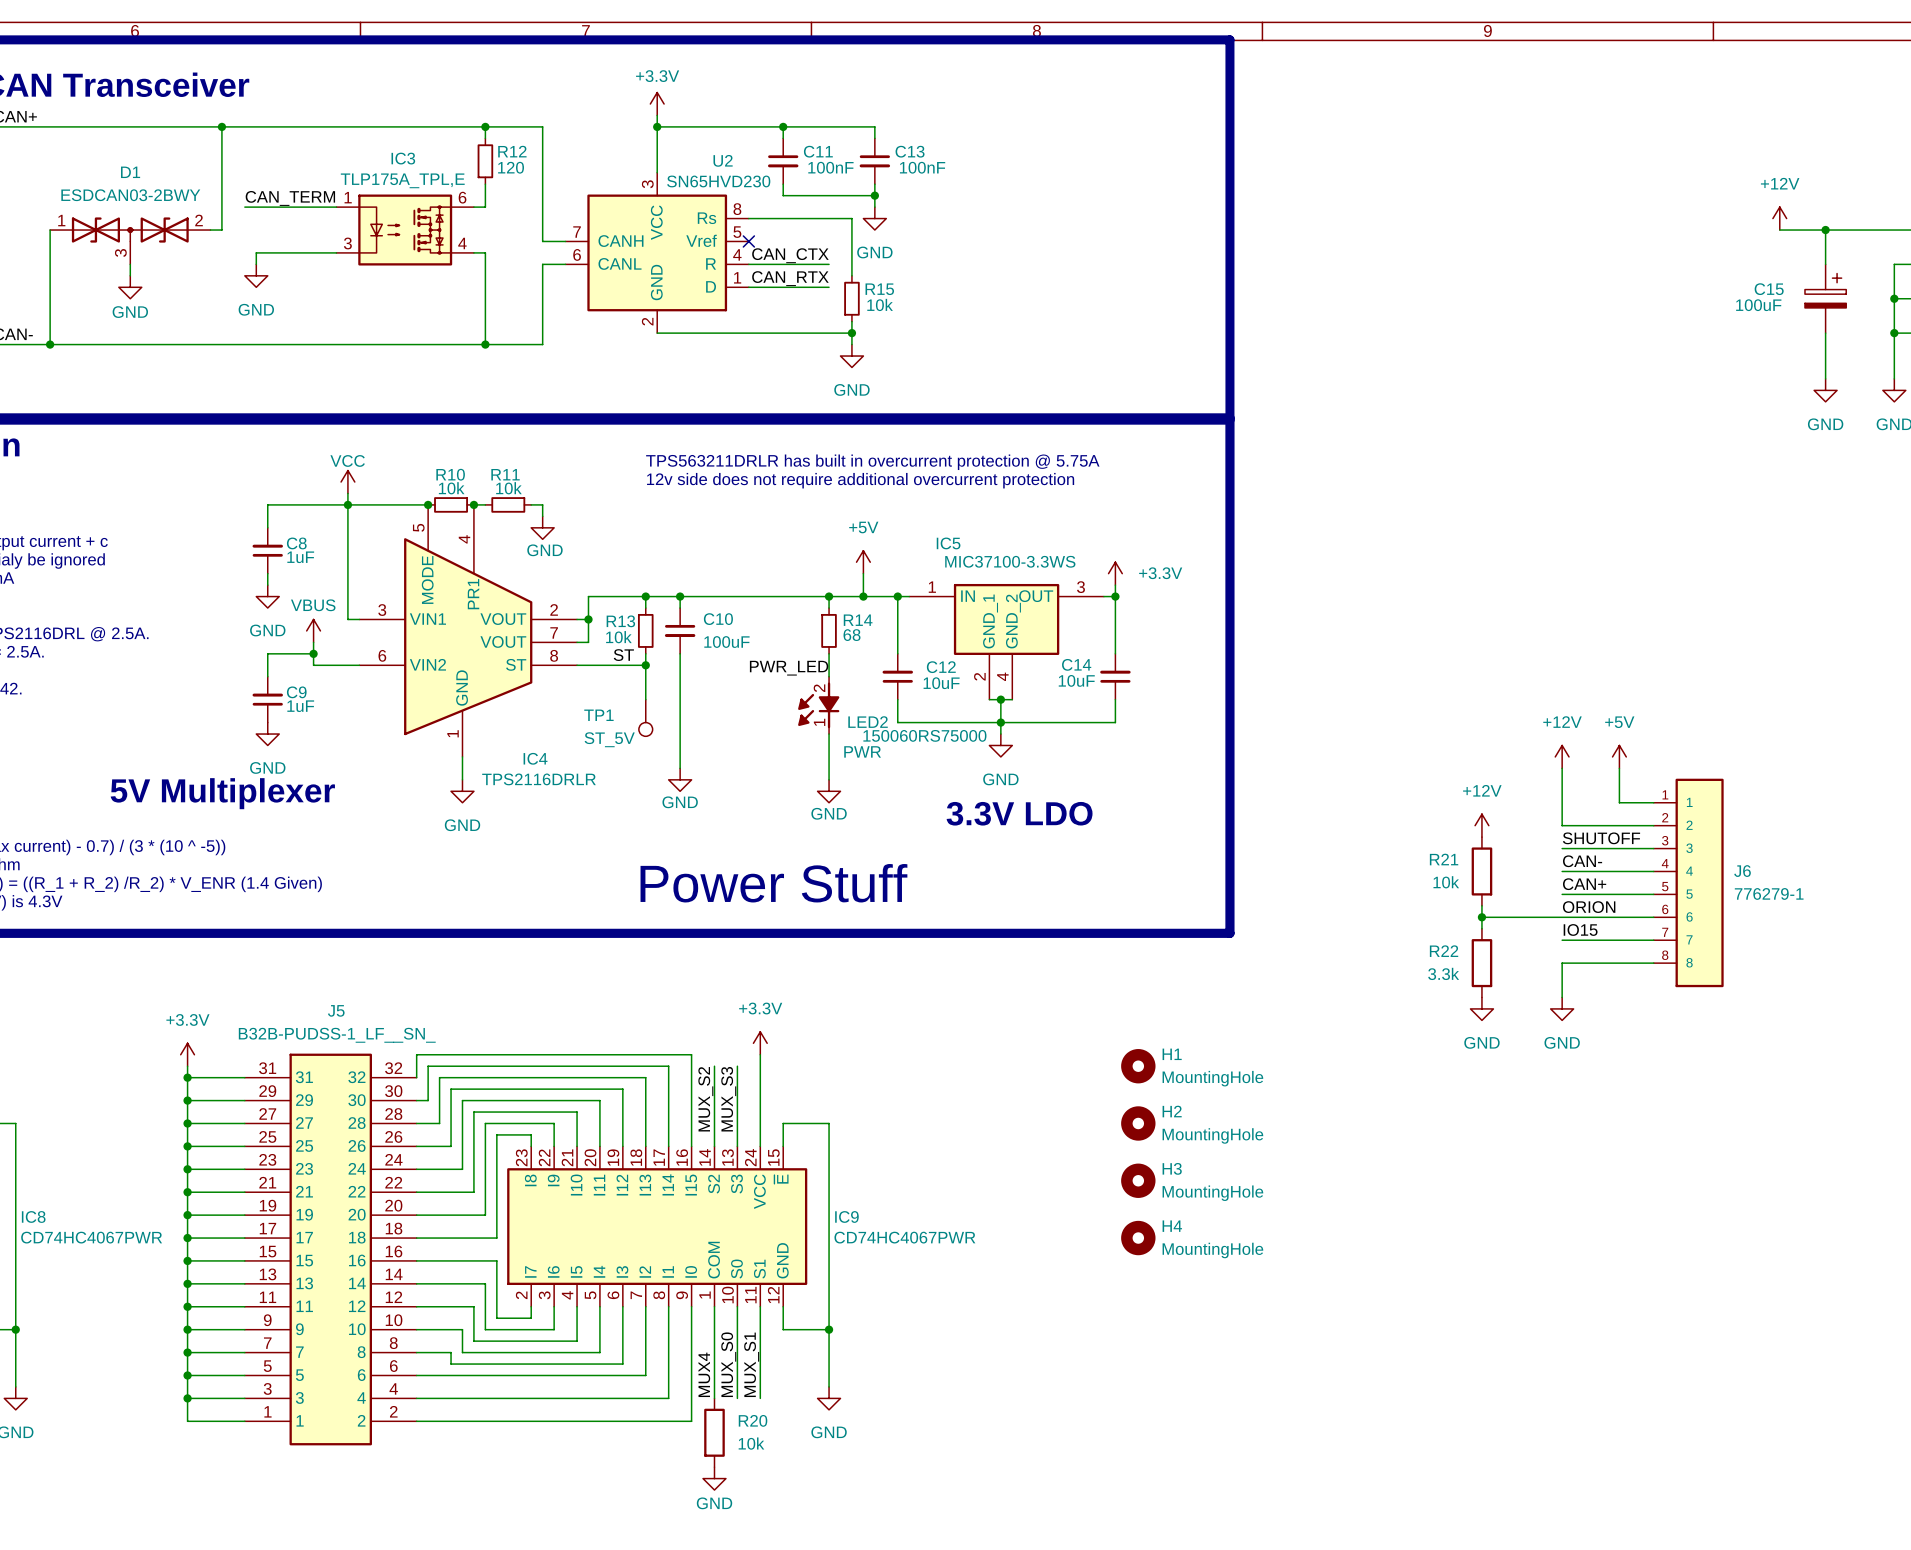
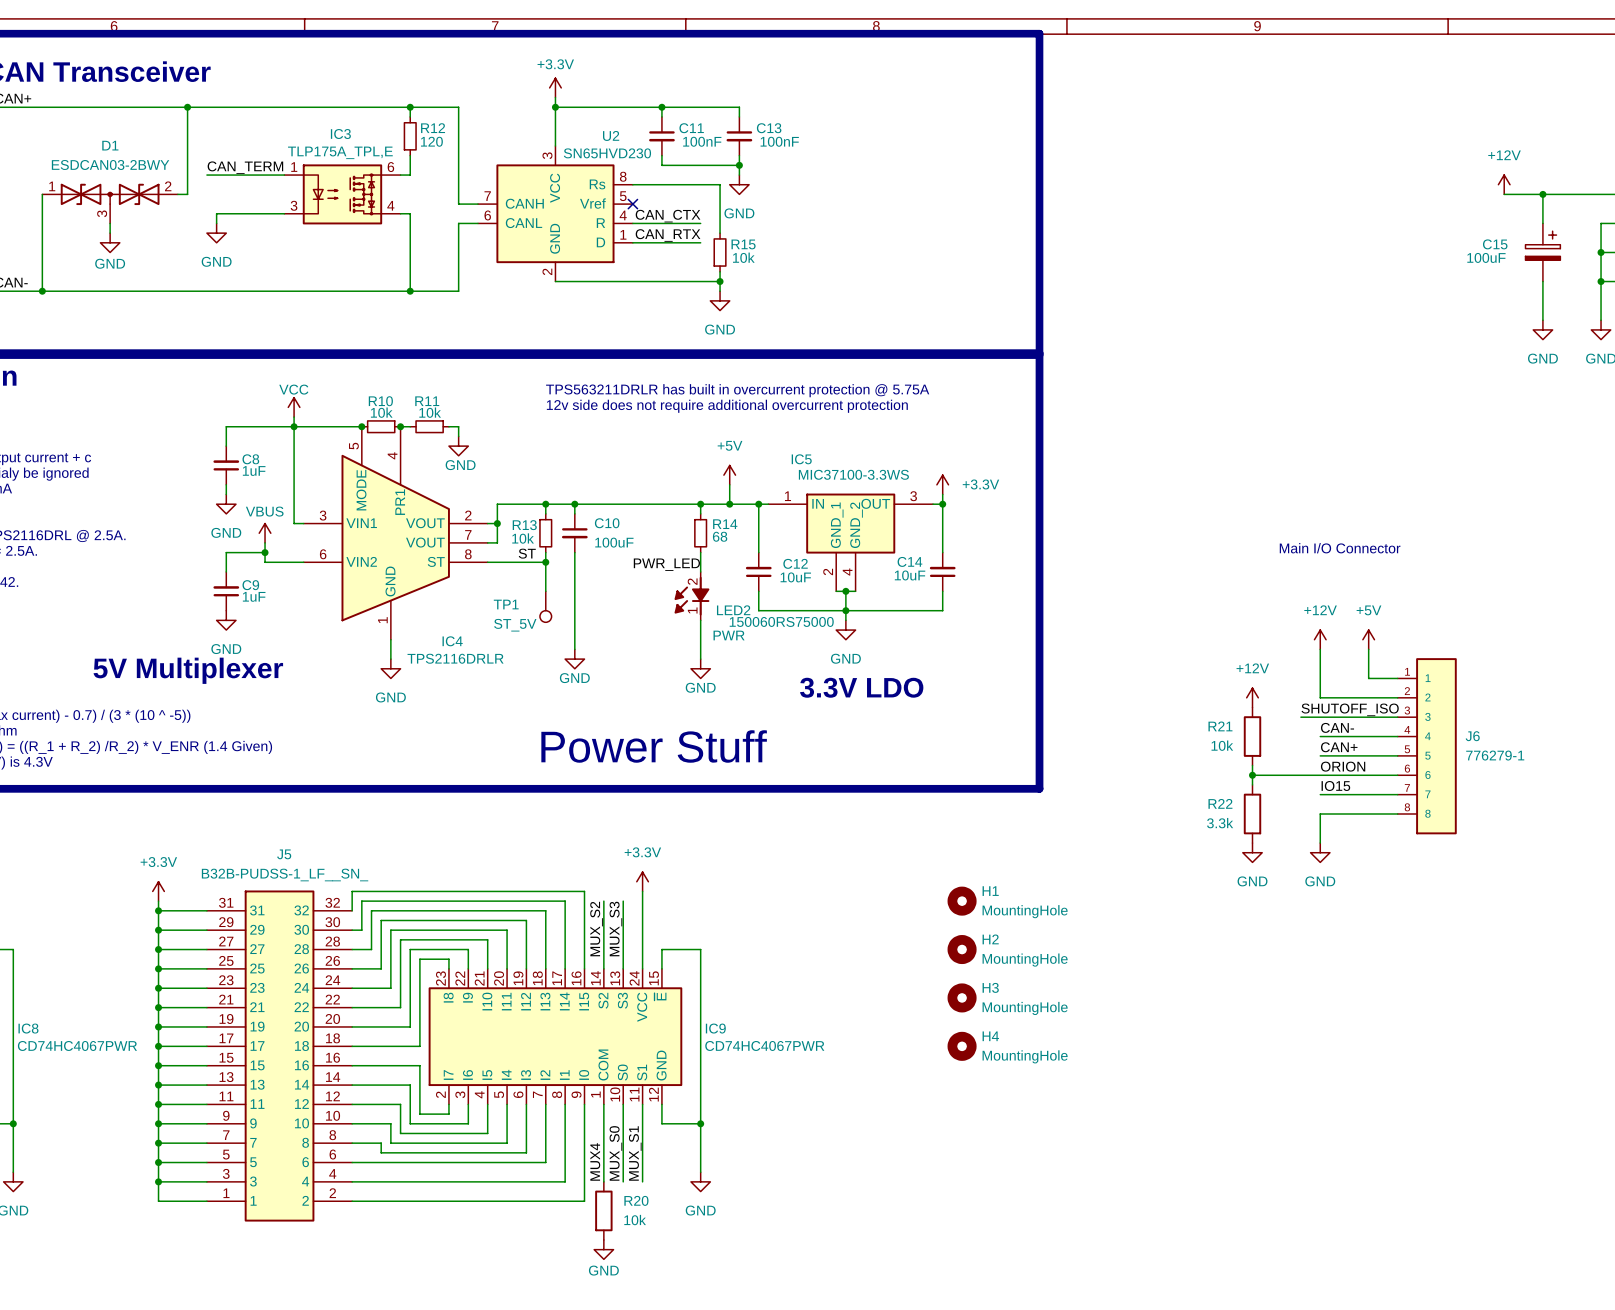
text: none -> Main I/O Connector (1340, 548)
label: SHUTOFF (1601, 838) -> SHUTOFF_ISO (1350, 709)
wire: none -> (1300, 717) (1320, 717)

